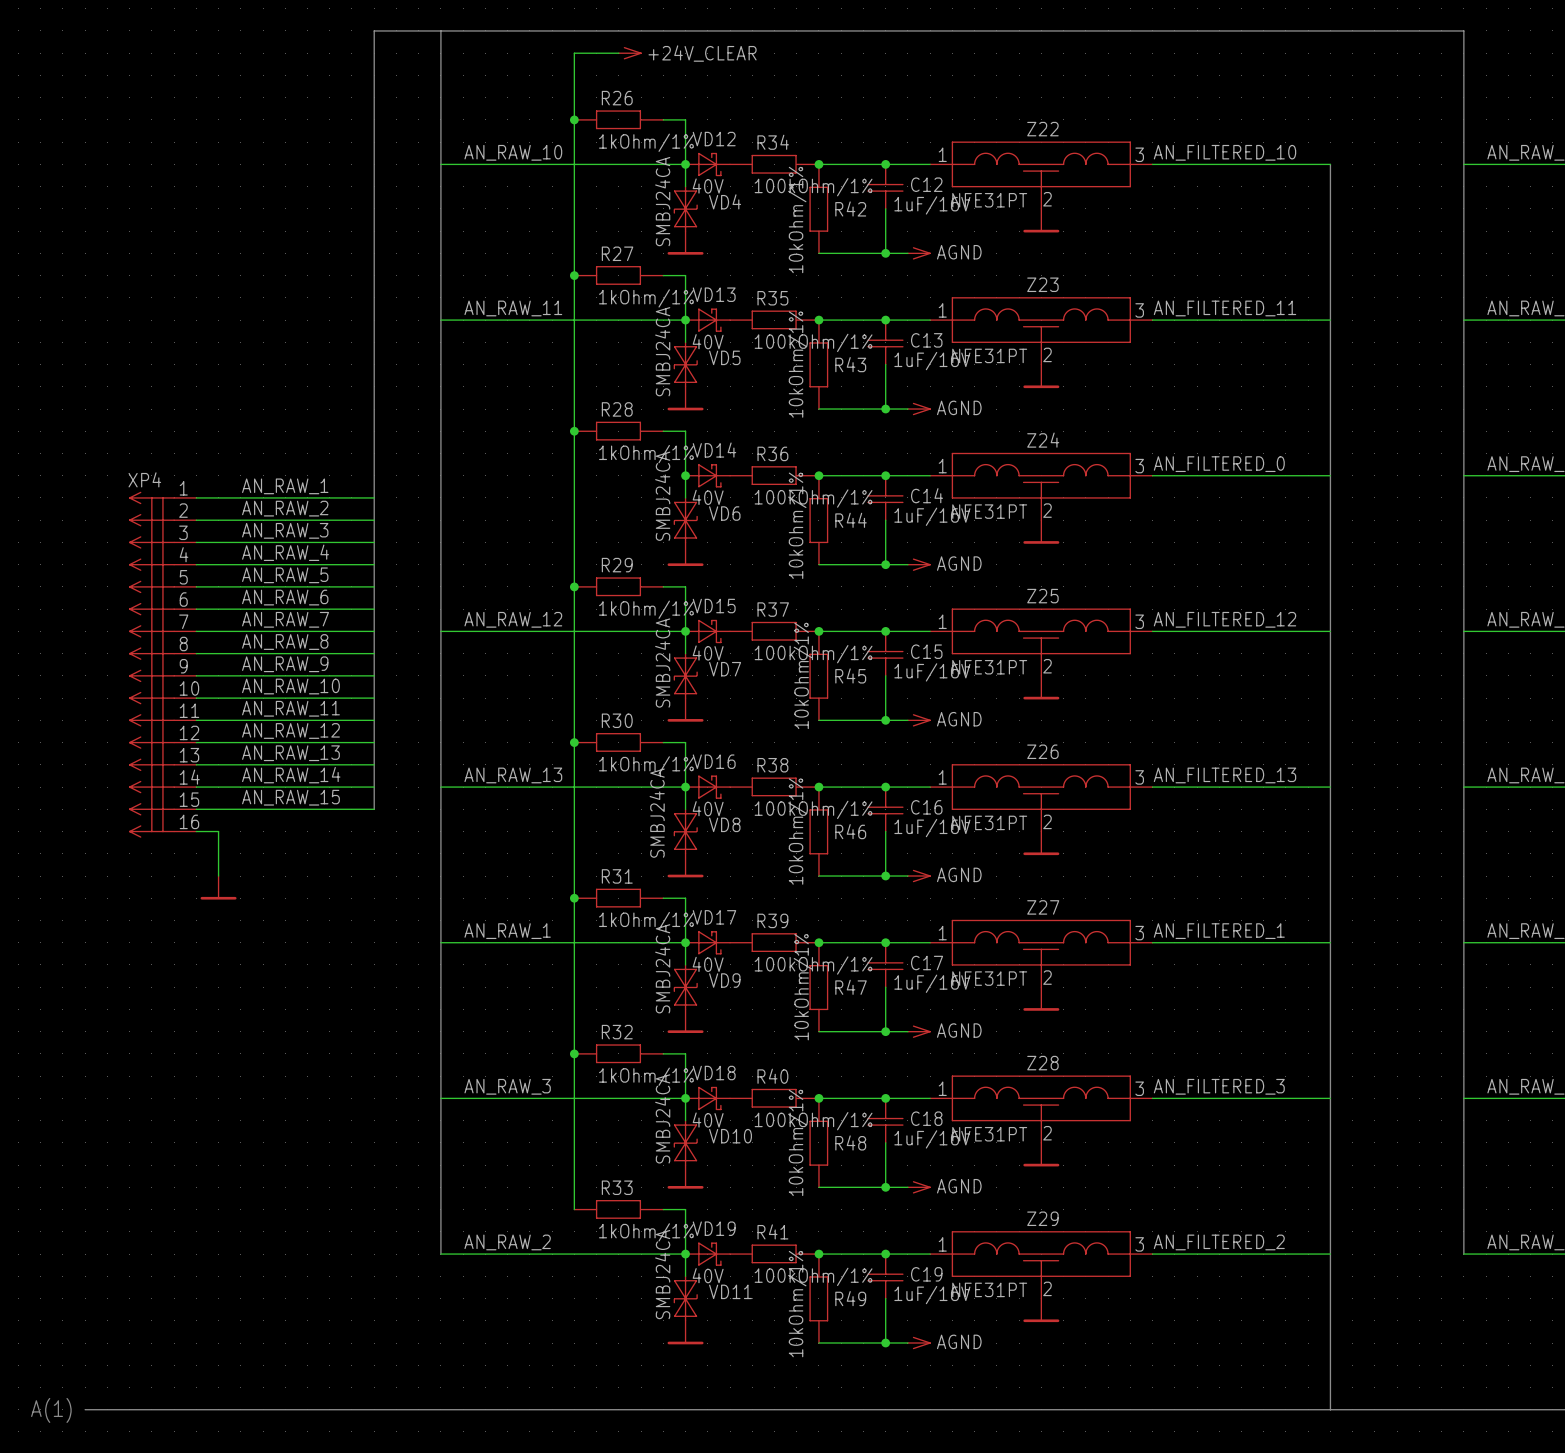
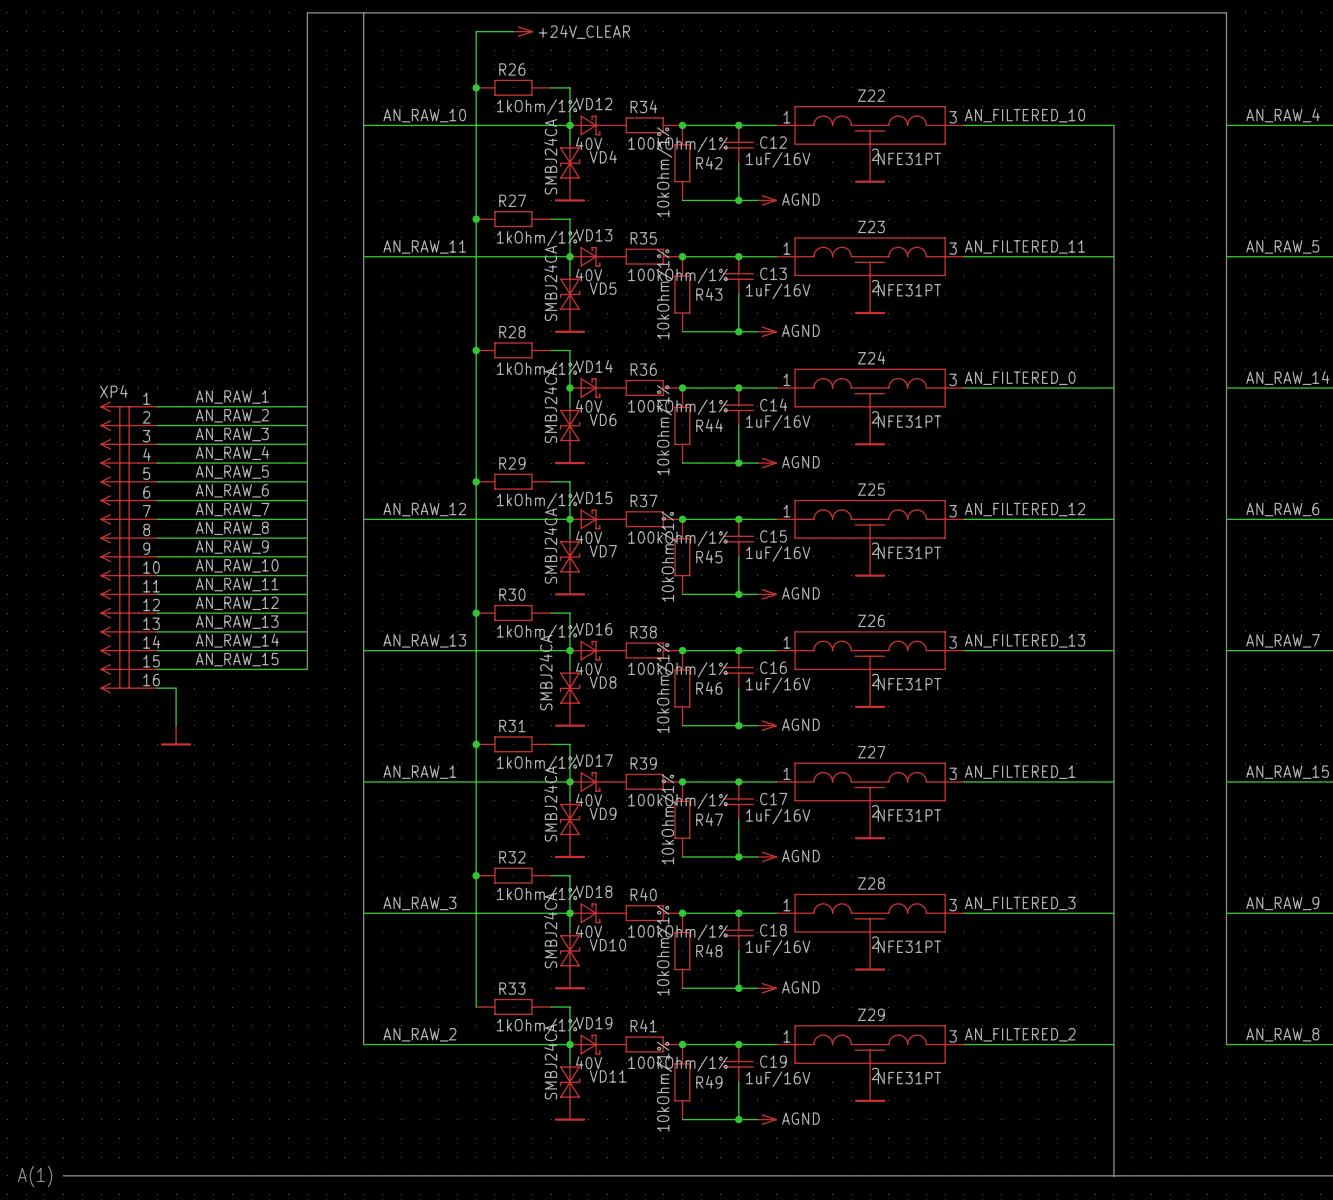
Z22 value position: NFE31PT (989, 200) -> NFE31PT (909, 158)
Z23 value position: NFE31PT (989, 355) -> NFE31PT (909, 290)
Z24 value position: NFE31PT (989, 511) -> NFE31PT (909, 421)
Z25 value position: NFE31PT (989, 667) -> NFE31PT (909, 552)
Z26 value position: NFE31PT (989, 822) -> NFE31PT (909, 684)
Z27 value position: NFE31PT (989, 978) -> NFE31PT (909, 815)
Z28 value position: NFE31PT (989, 1134) -> NFE31PT (909, 946)
Z29 value position: NFE31PT (989, 1289) -> NFE31PT (909, 1078)

